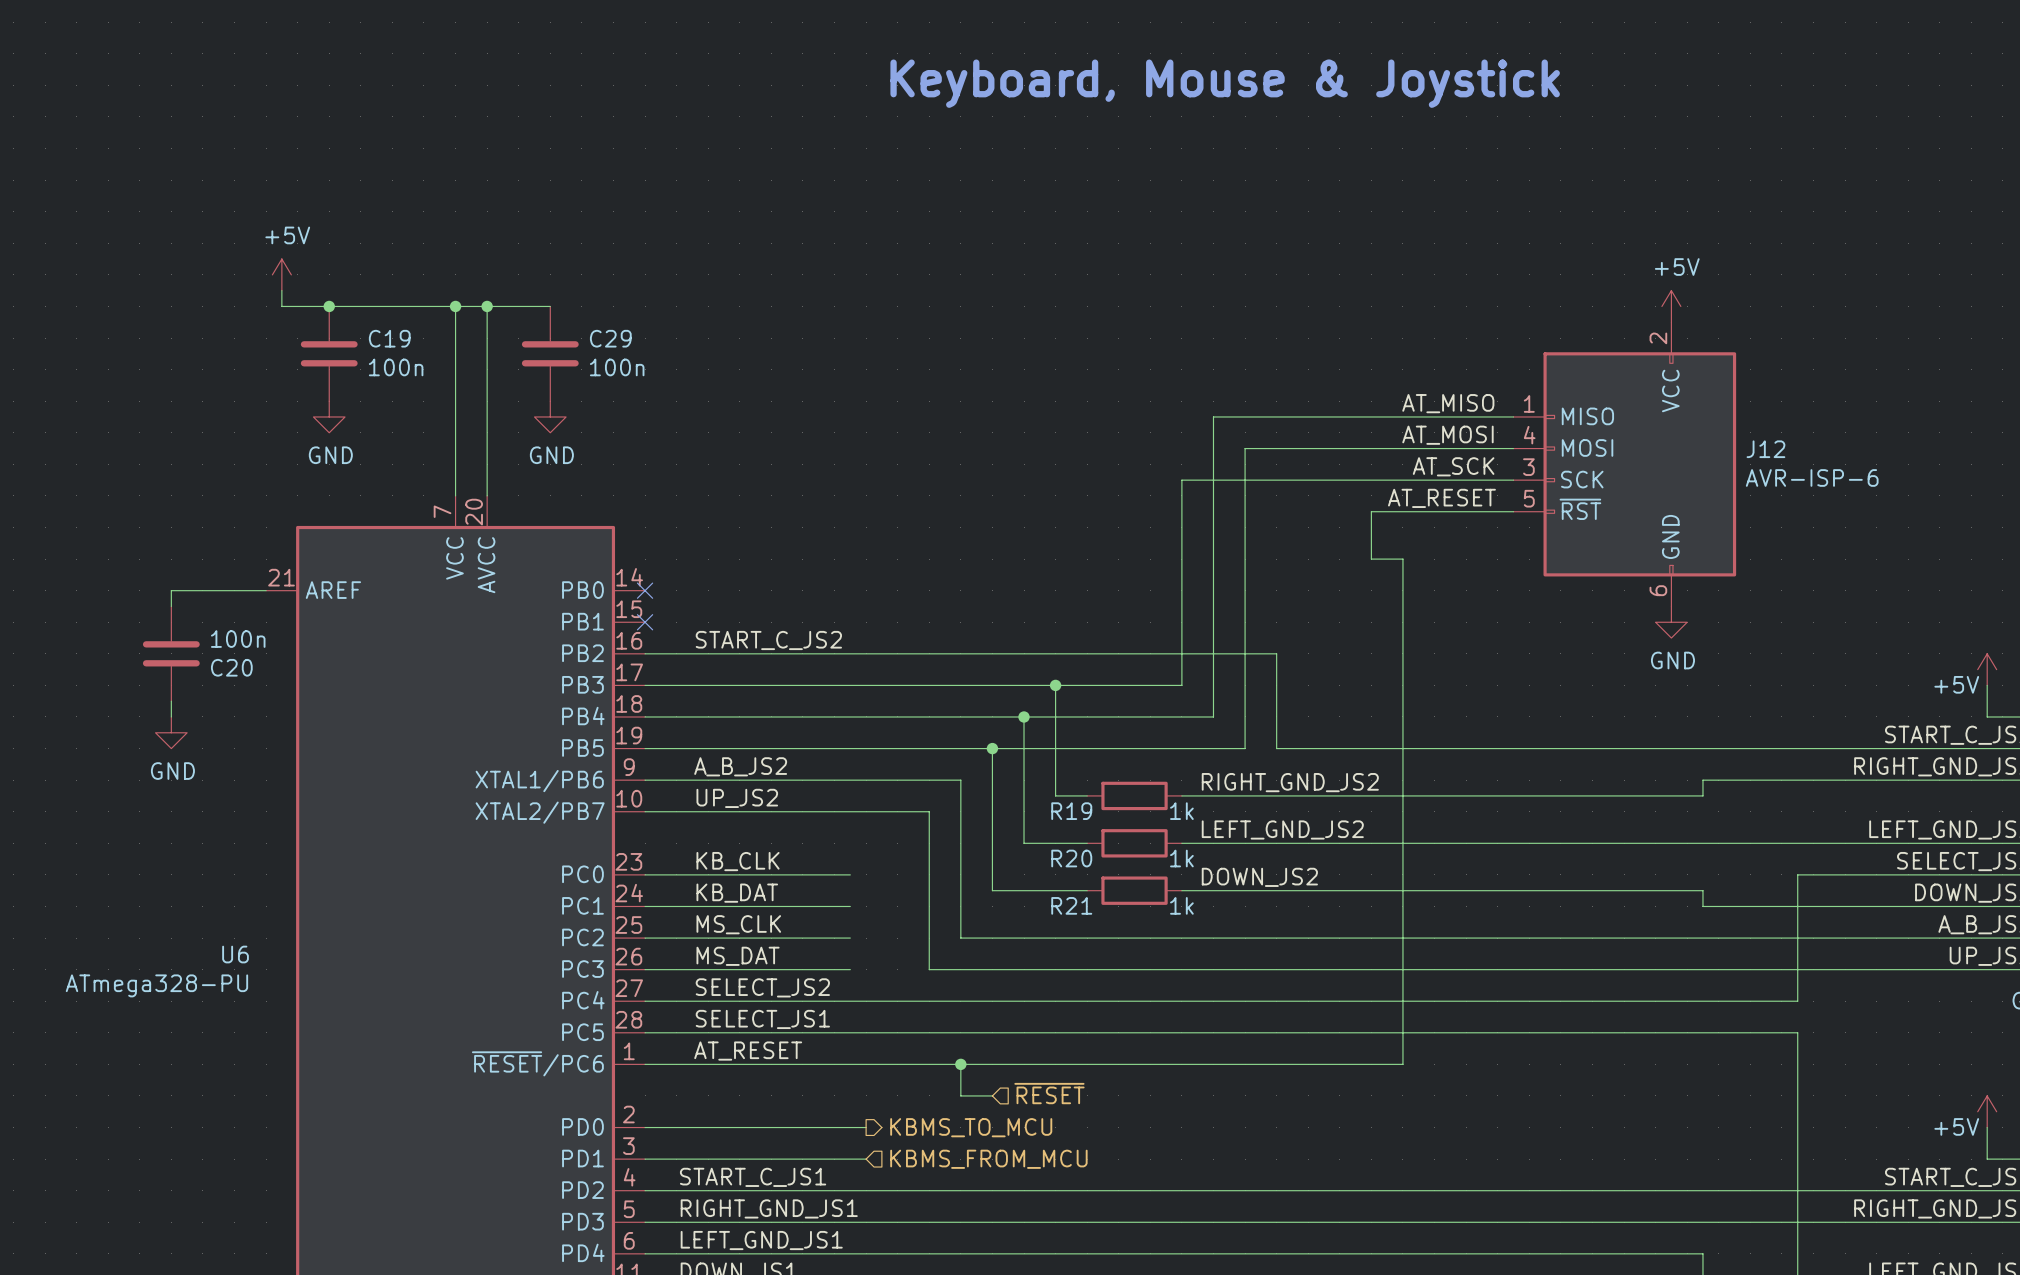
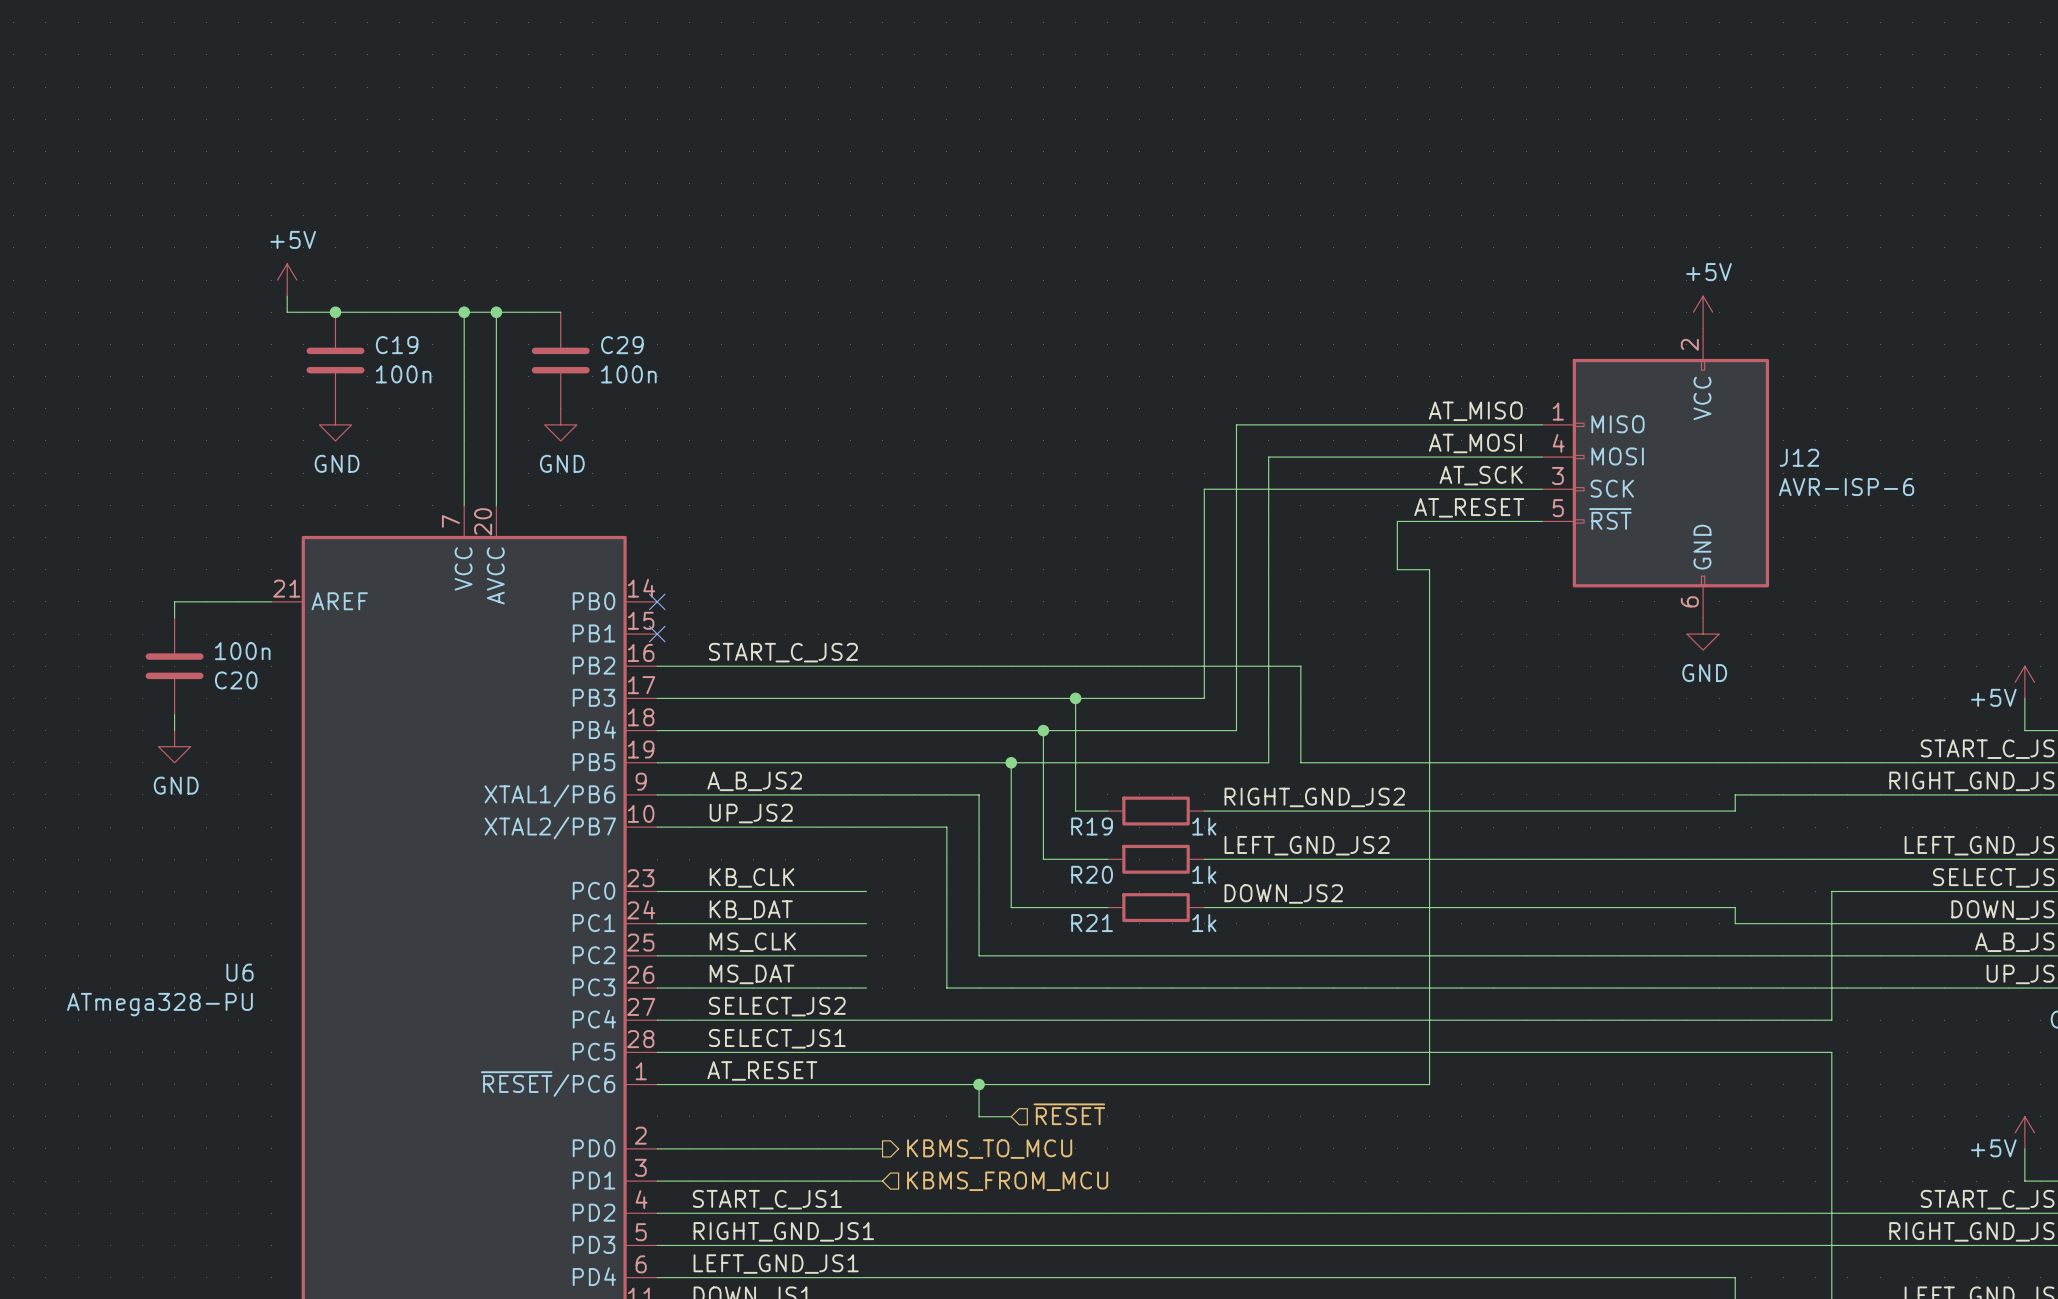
text: Keyboard, Mouse & Joystick (1225, 83) -> none

